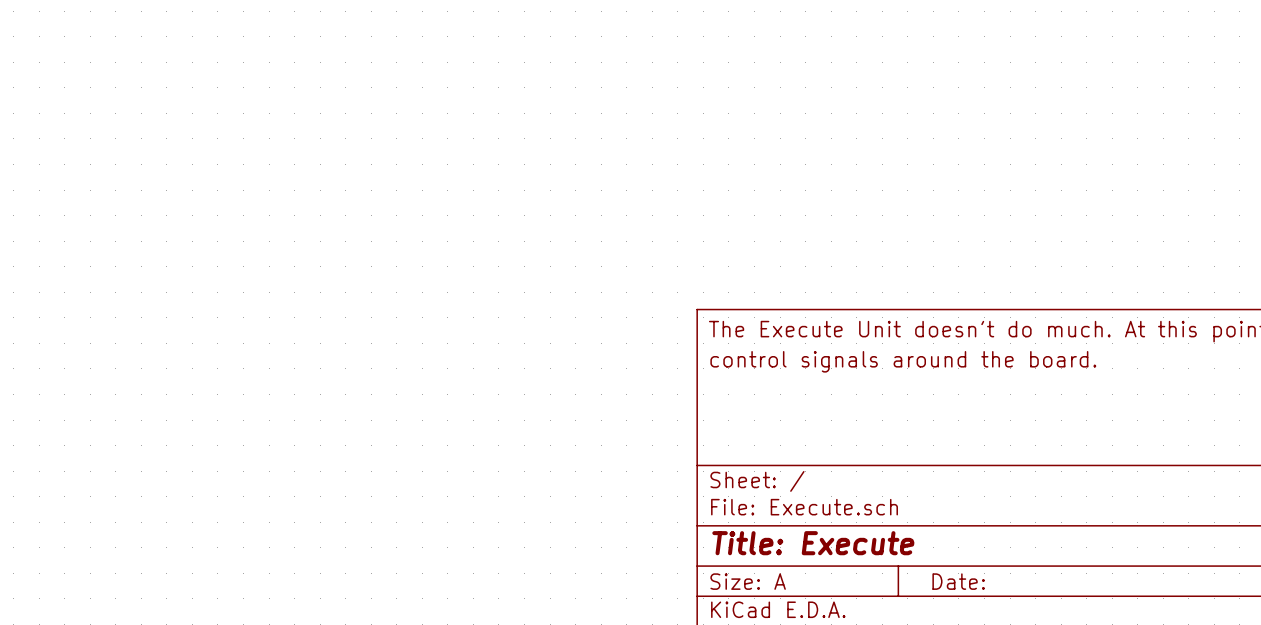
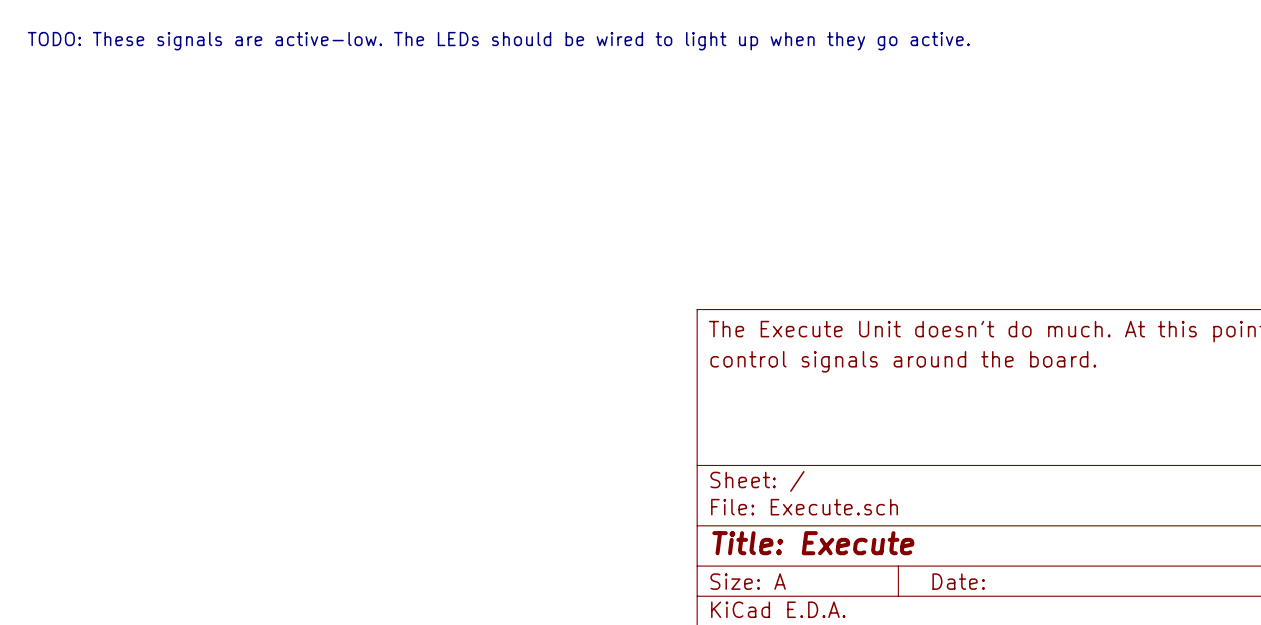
text: none -> TODO: These signals are active-low. The LEDs should be wired to light up when they go active. (498, 41)

